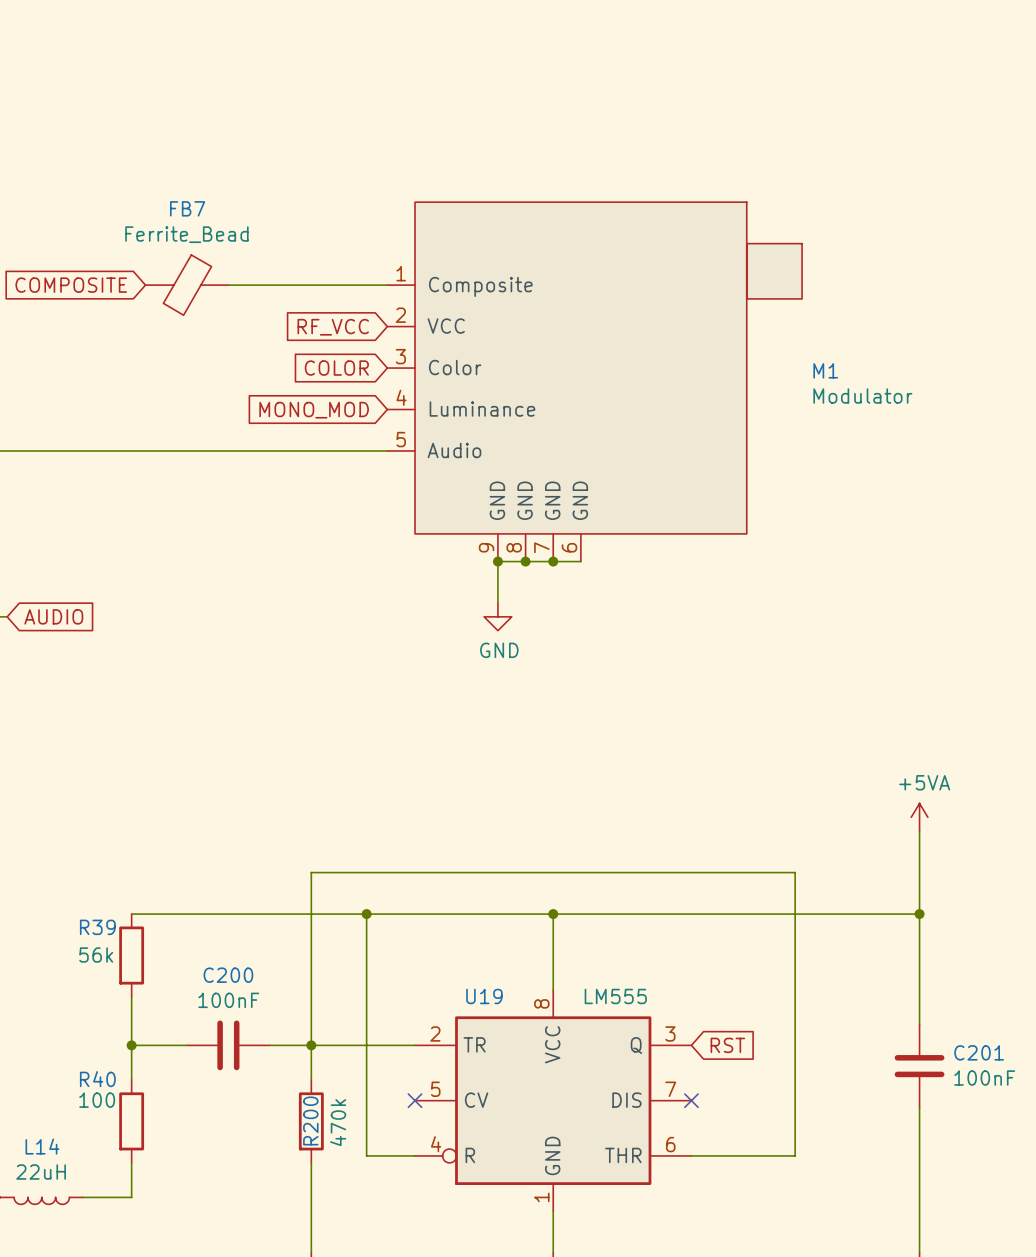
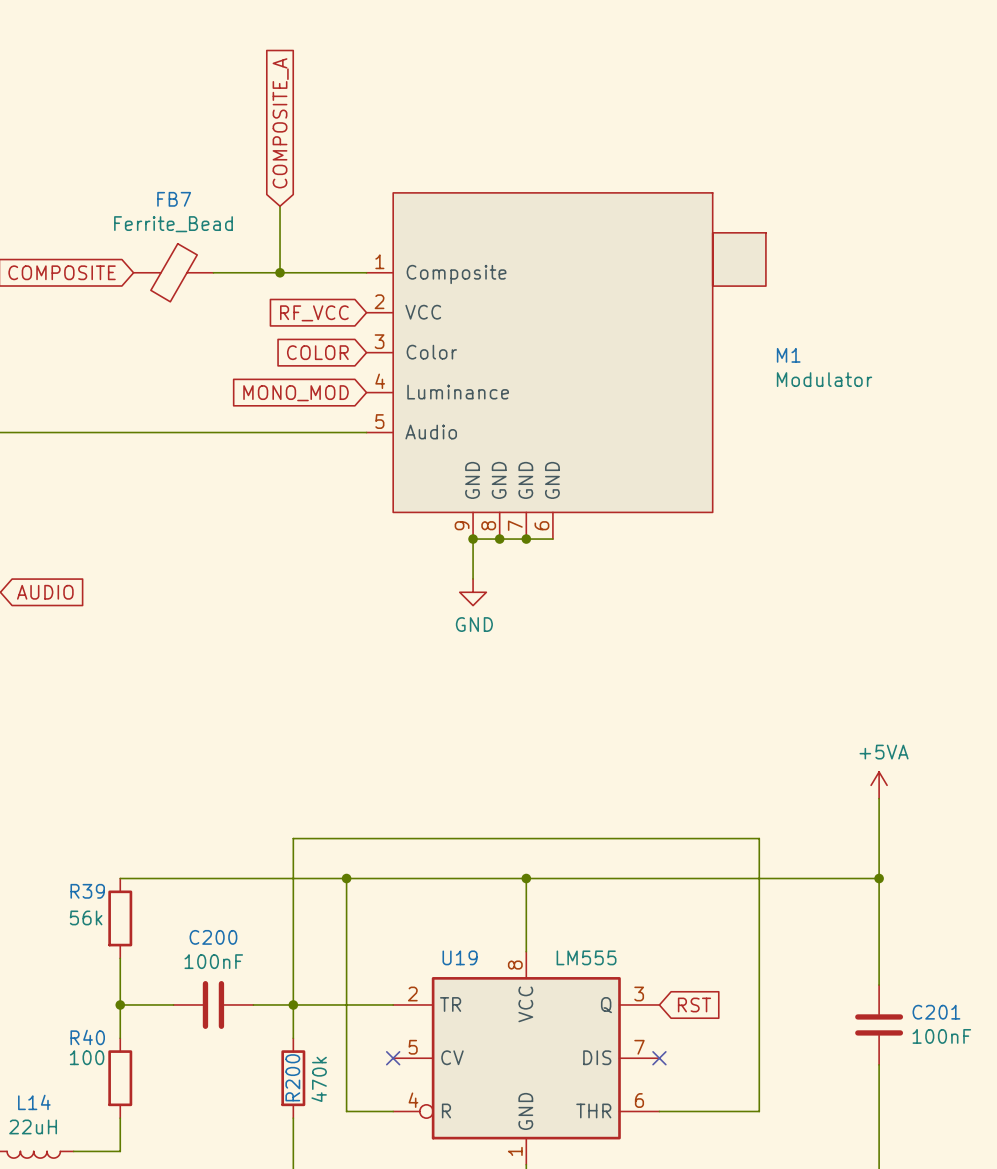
global label: none -> COMPOSITE_A (280, 123)
wire: none -> (280, 206) (280, 272)
junction: none -> (280, 272)

